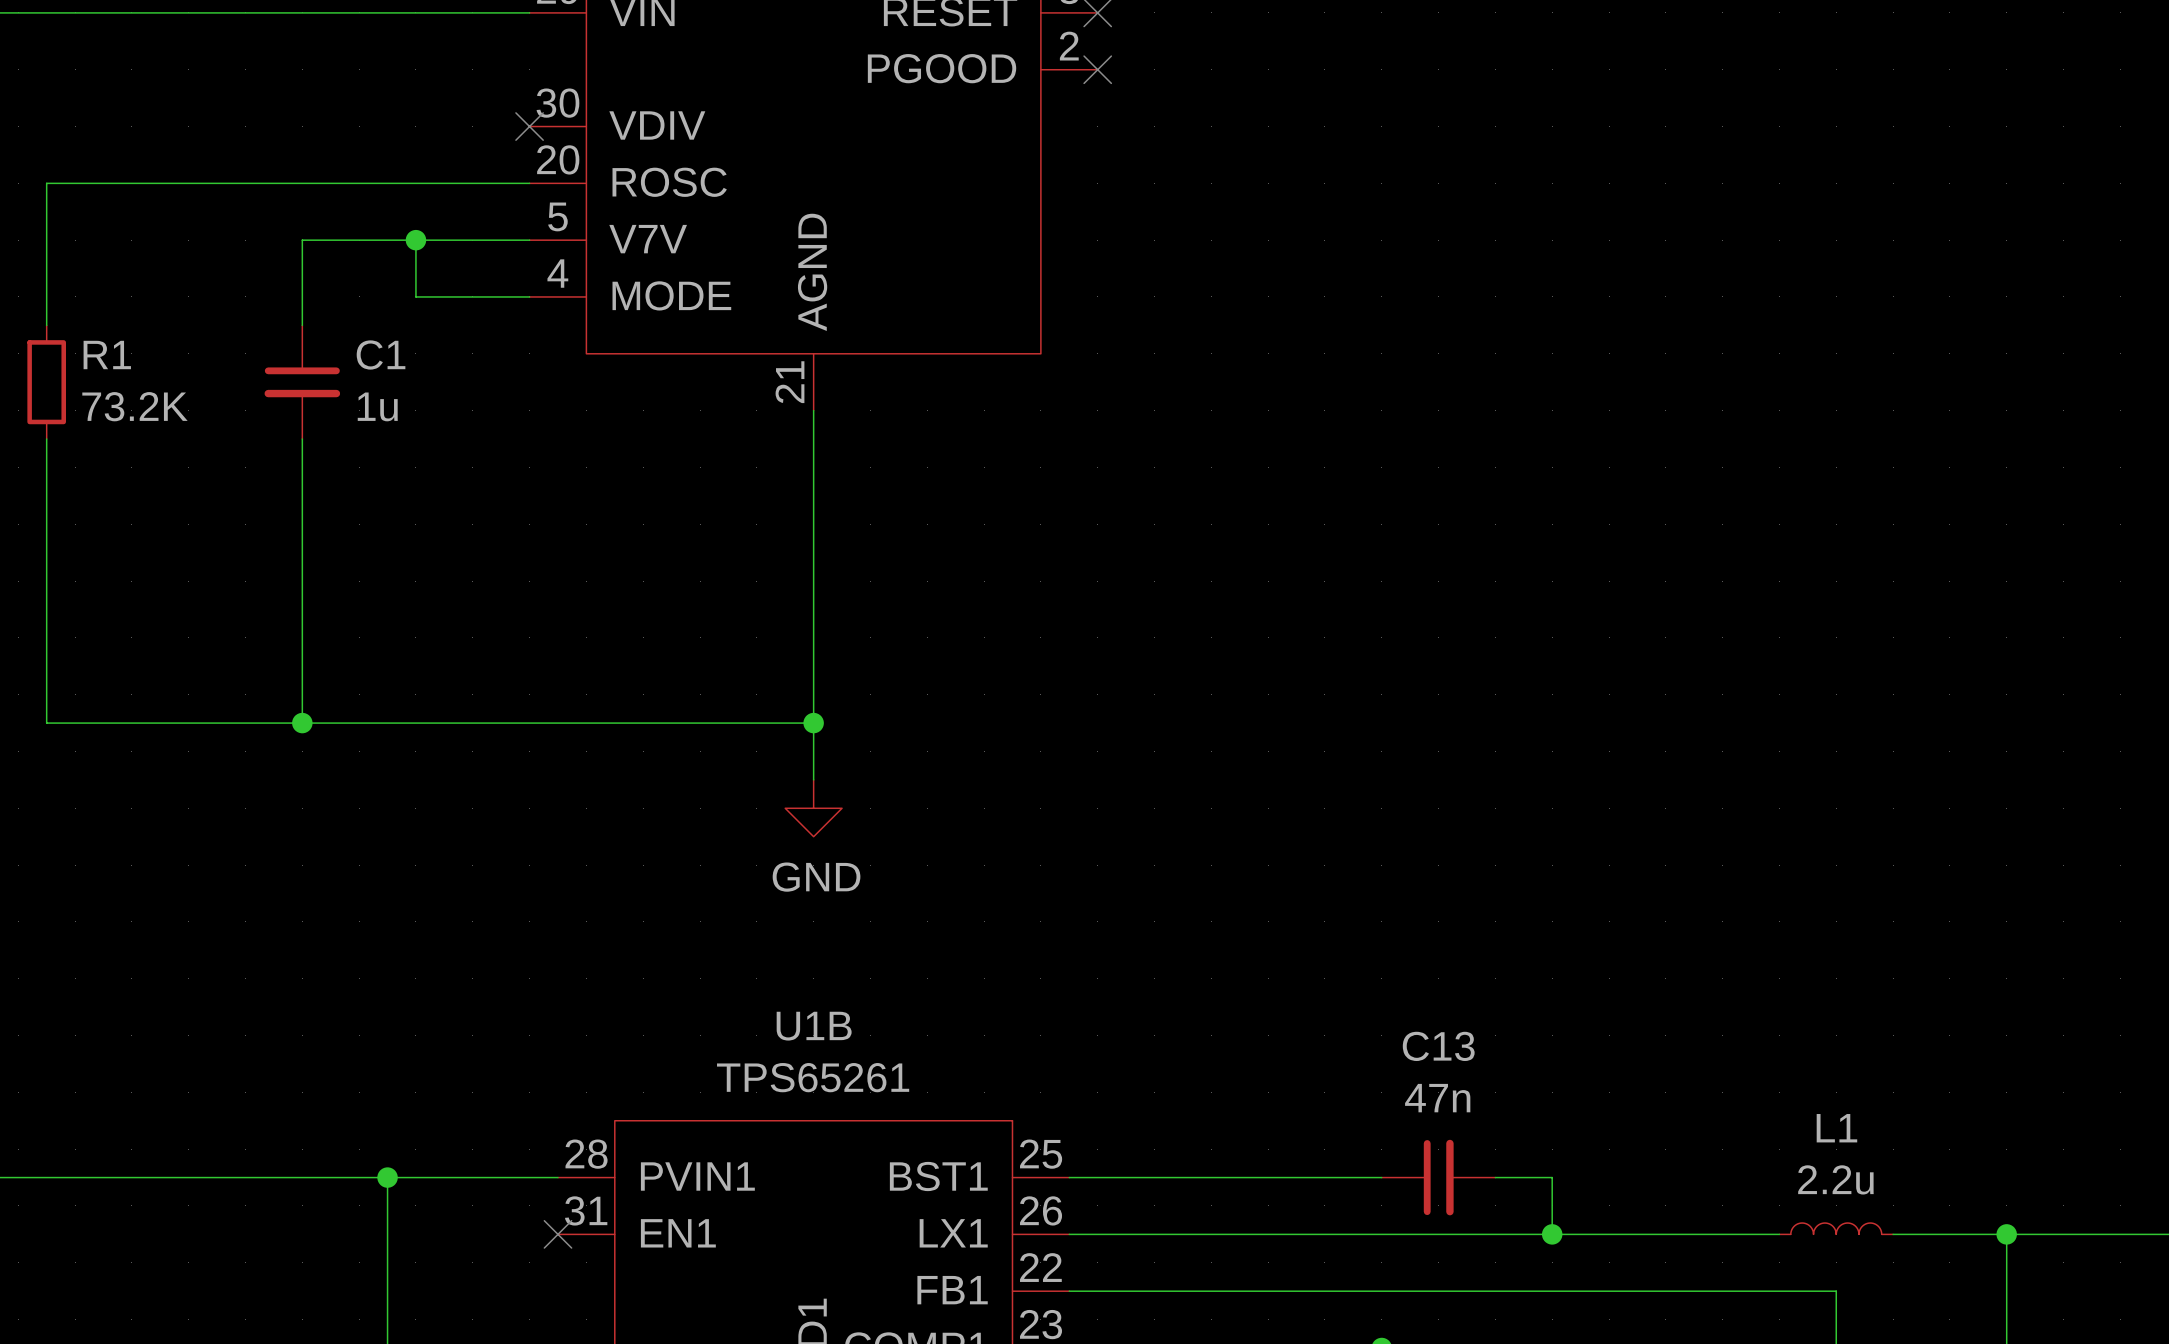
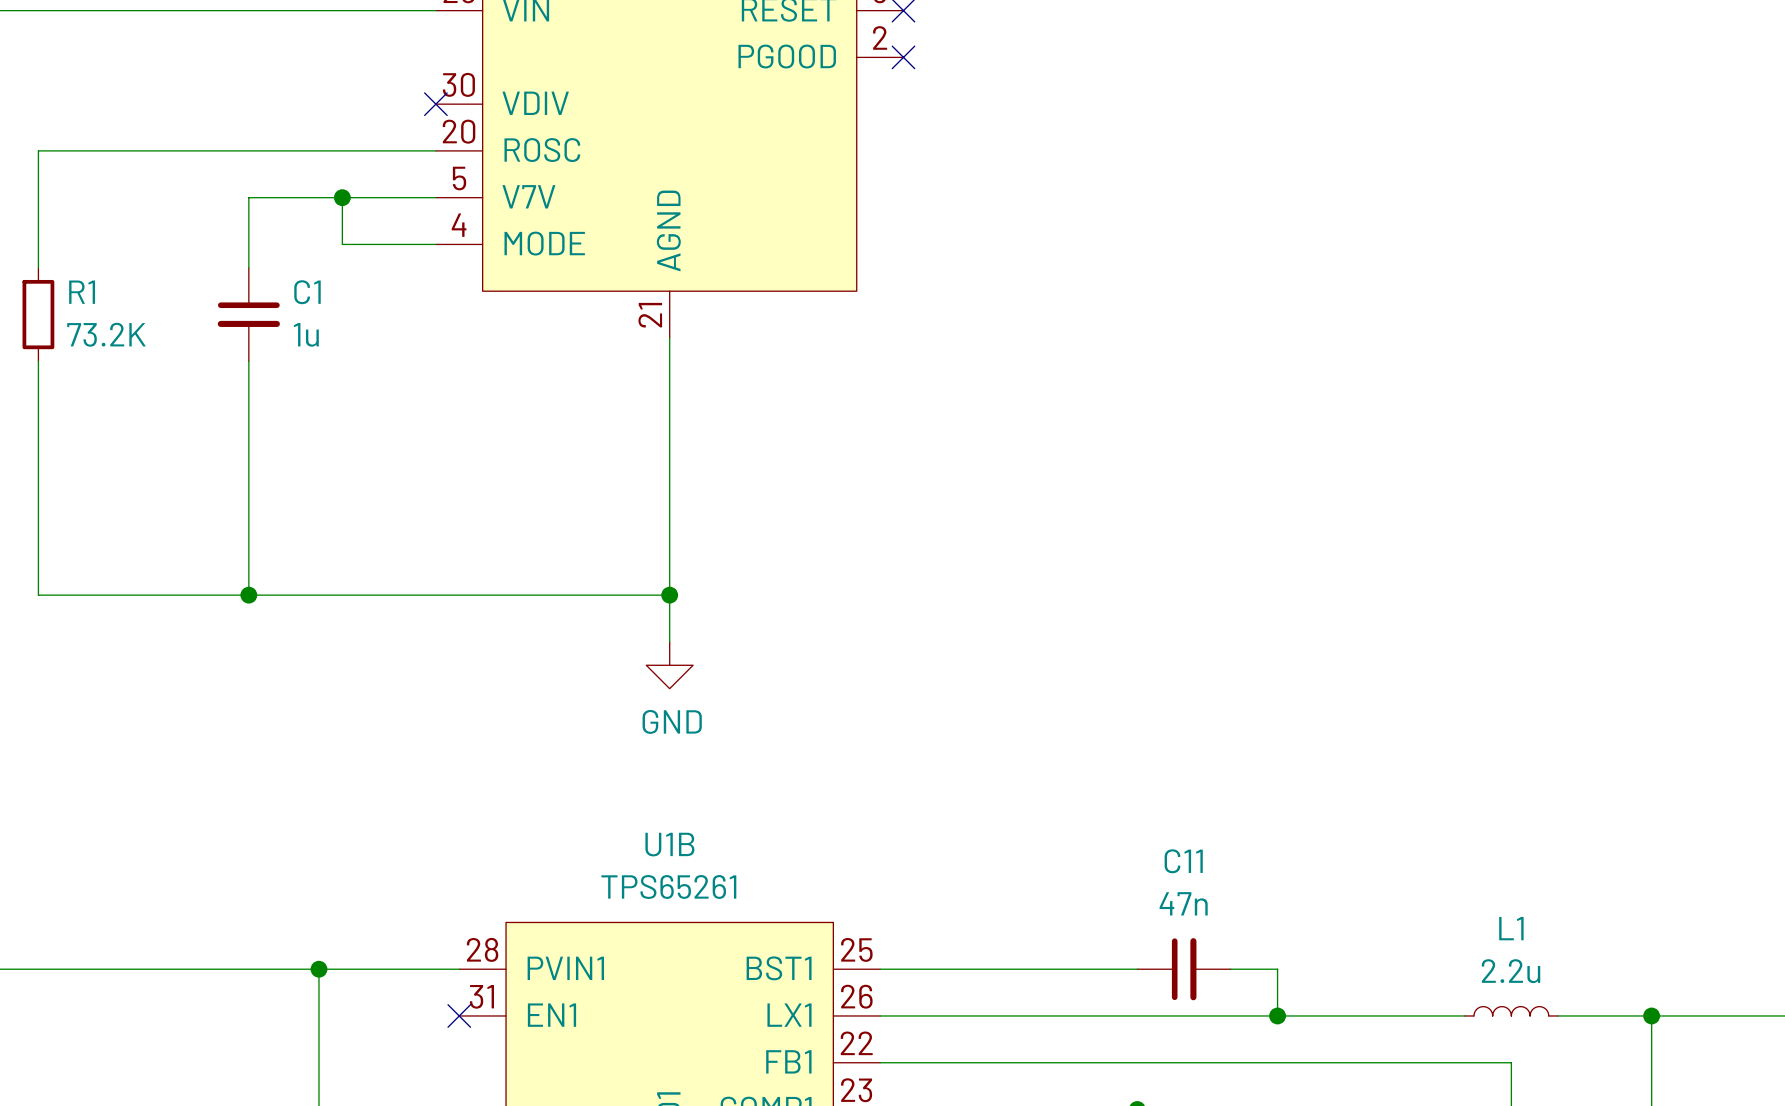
C13 name: C13 (1438, 1046) -> C11 (1183, 861)

